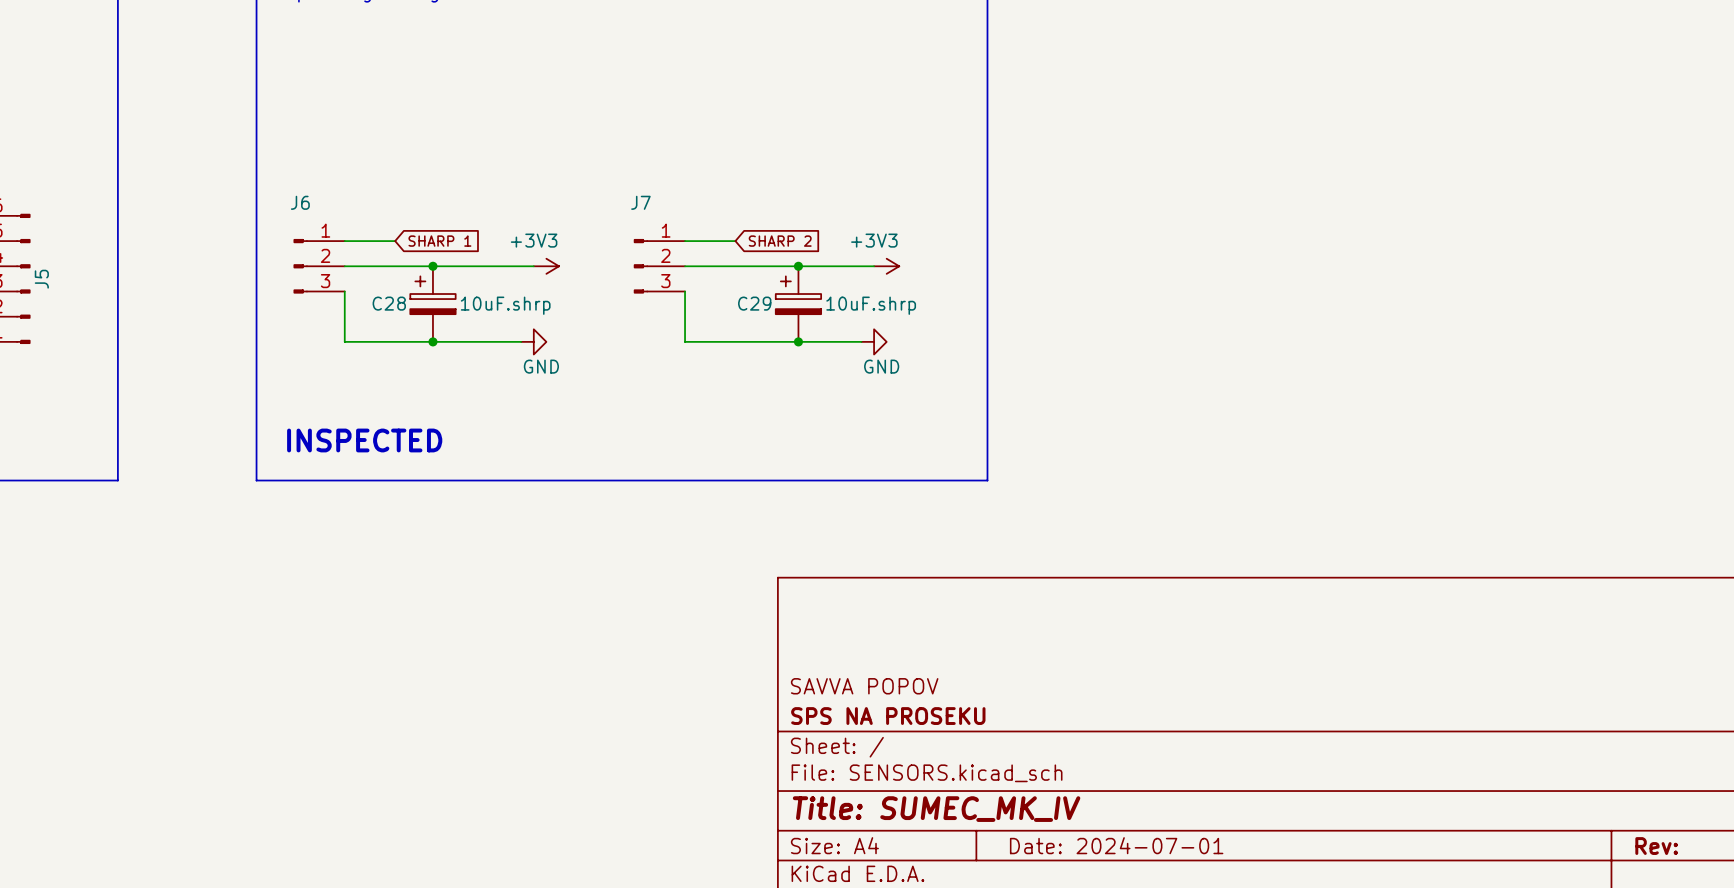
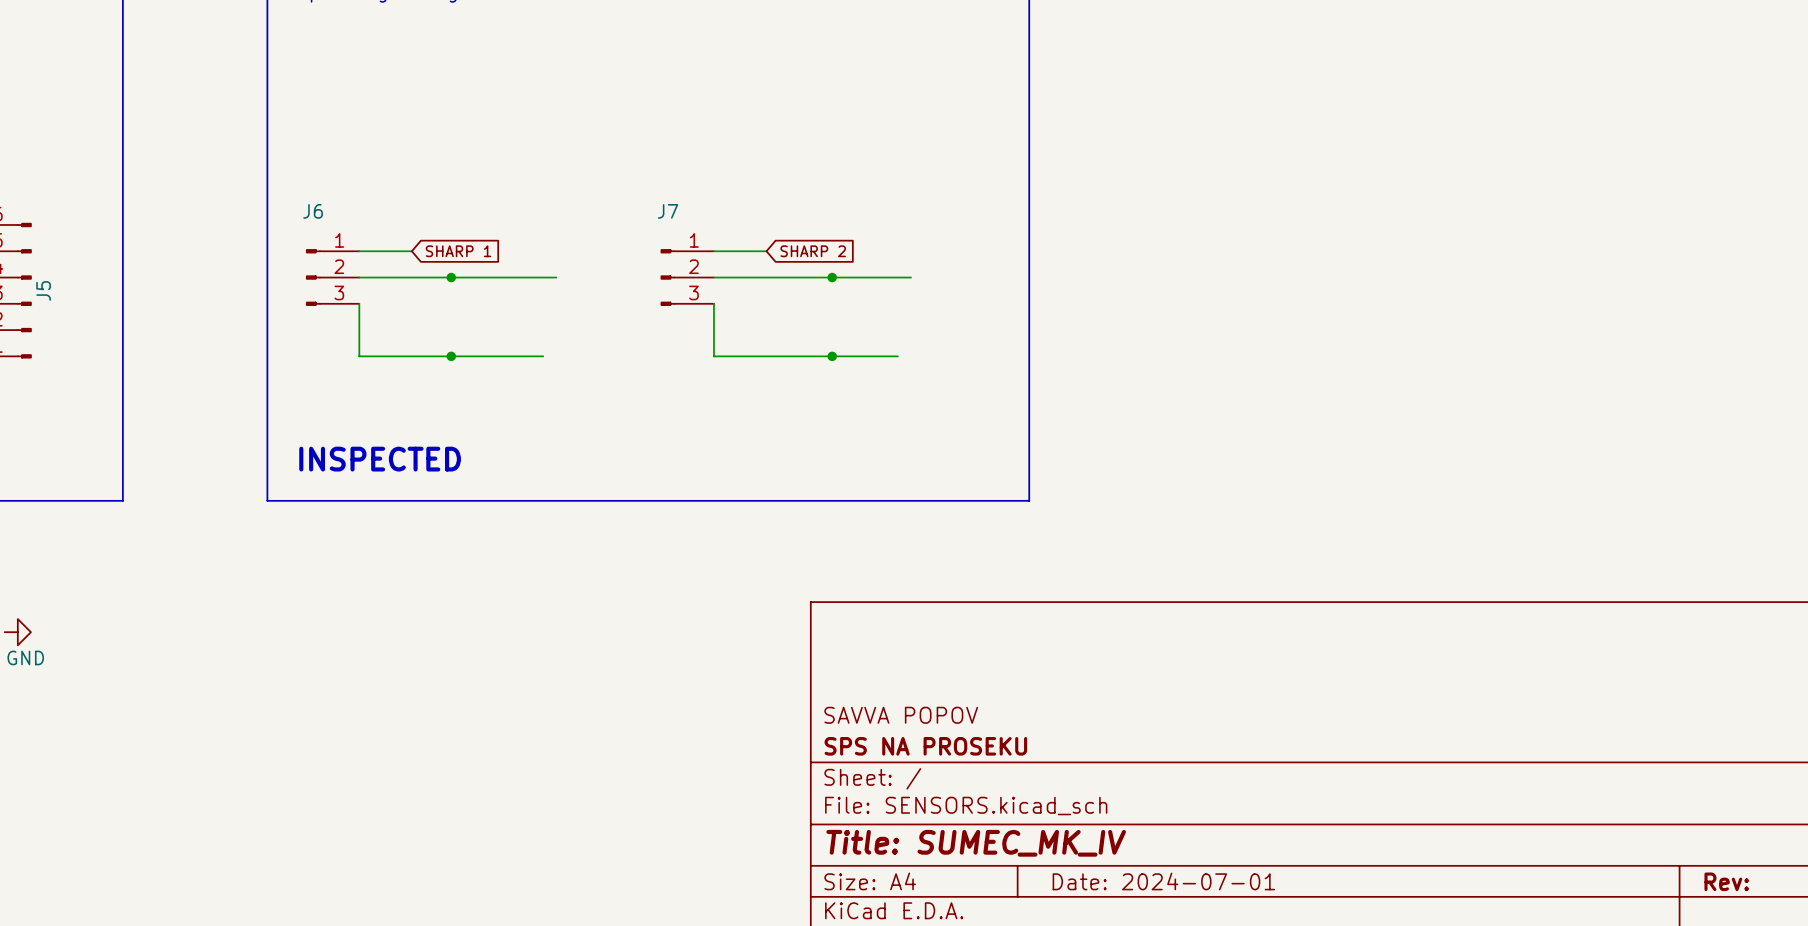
power symbol: +3V3 (546, 266) -> none
power symbol: +3V3 (886, 266) -> none
C28: 10uF.shrp (432, 304) -> none
C29: 10uF.shrp (798, 304) -> none
power symbol: GND (533, 341) -> none
power symbol: GND (874, 341) -> none
power symbol: none -> GND (17, 632)

